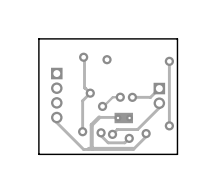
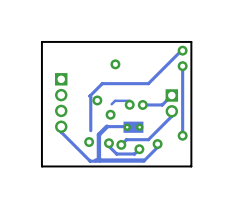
track: none -> (182, 50) (148, 83) (102, 83) (89, 96) (90, 130)
via: none -> (182, 50)
track: (83, 57) (84, 87) (90, 93) (82, 100) (82, 131) -> none
via: (83, 57) -> none
track: none -> (130, 100) (115, 100) (111, 104)
track: (120, 97) (112, 97) (104, 105) -> none

